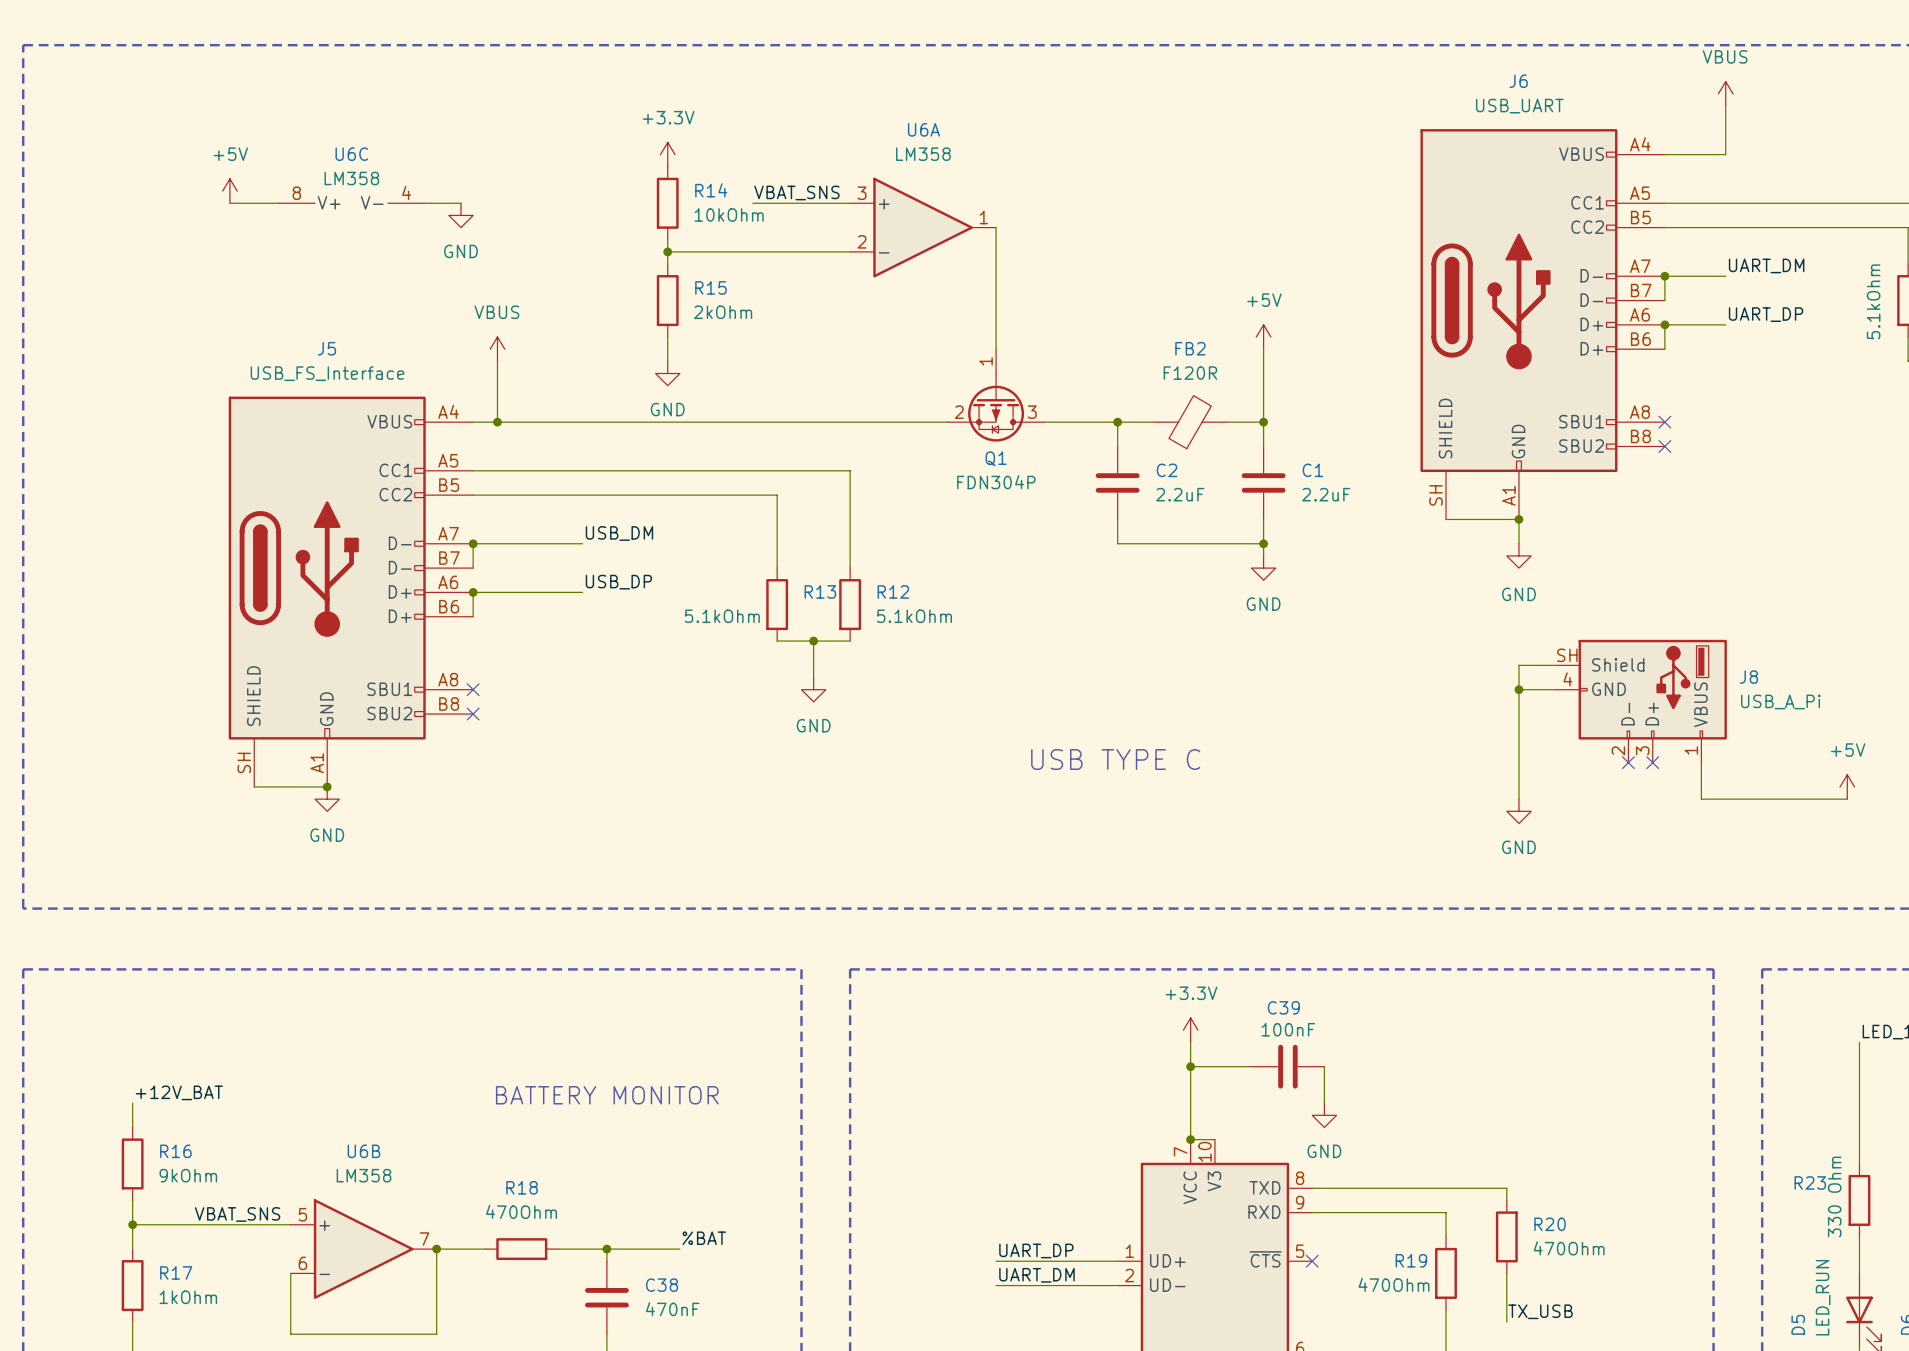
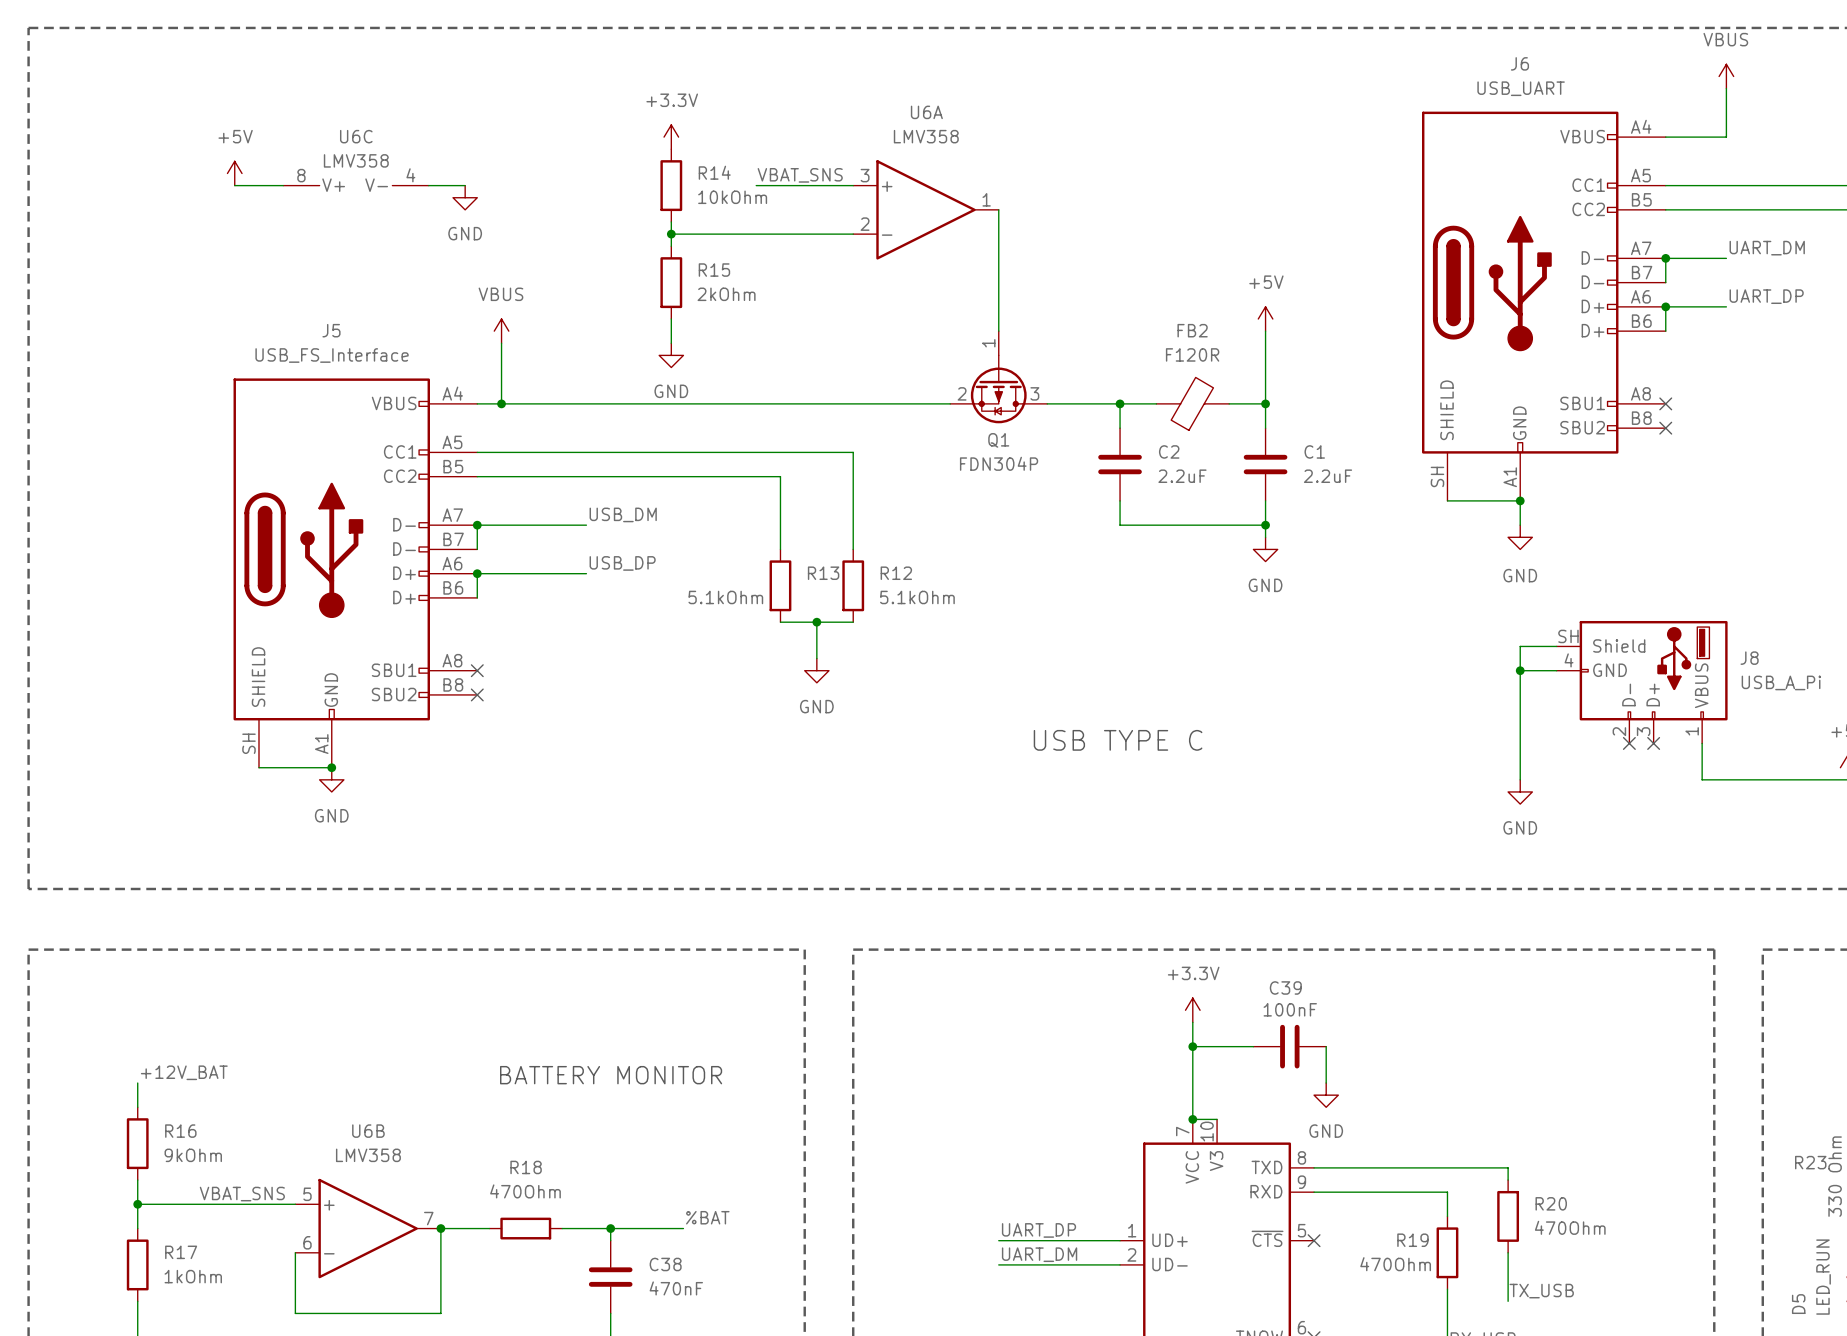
U6A value: LM358 (923, 154) -> LMV358 (926, 136)
U6C value: LM358 (351, 178) -> LMV358 (356, 160)
U6B value: LM358 (363, 1175) -> LMV358 (368, 1155)

